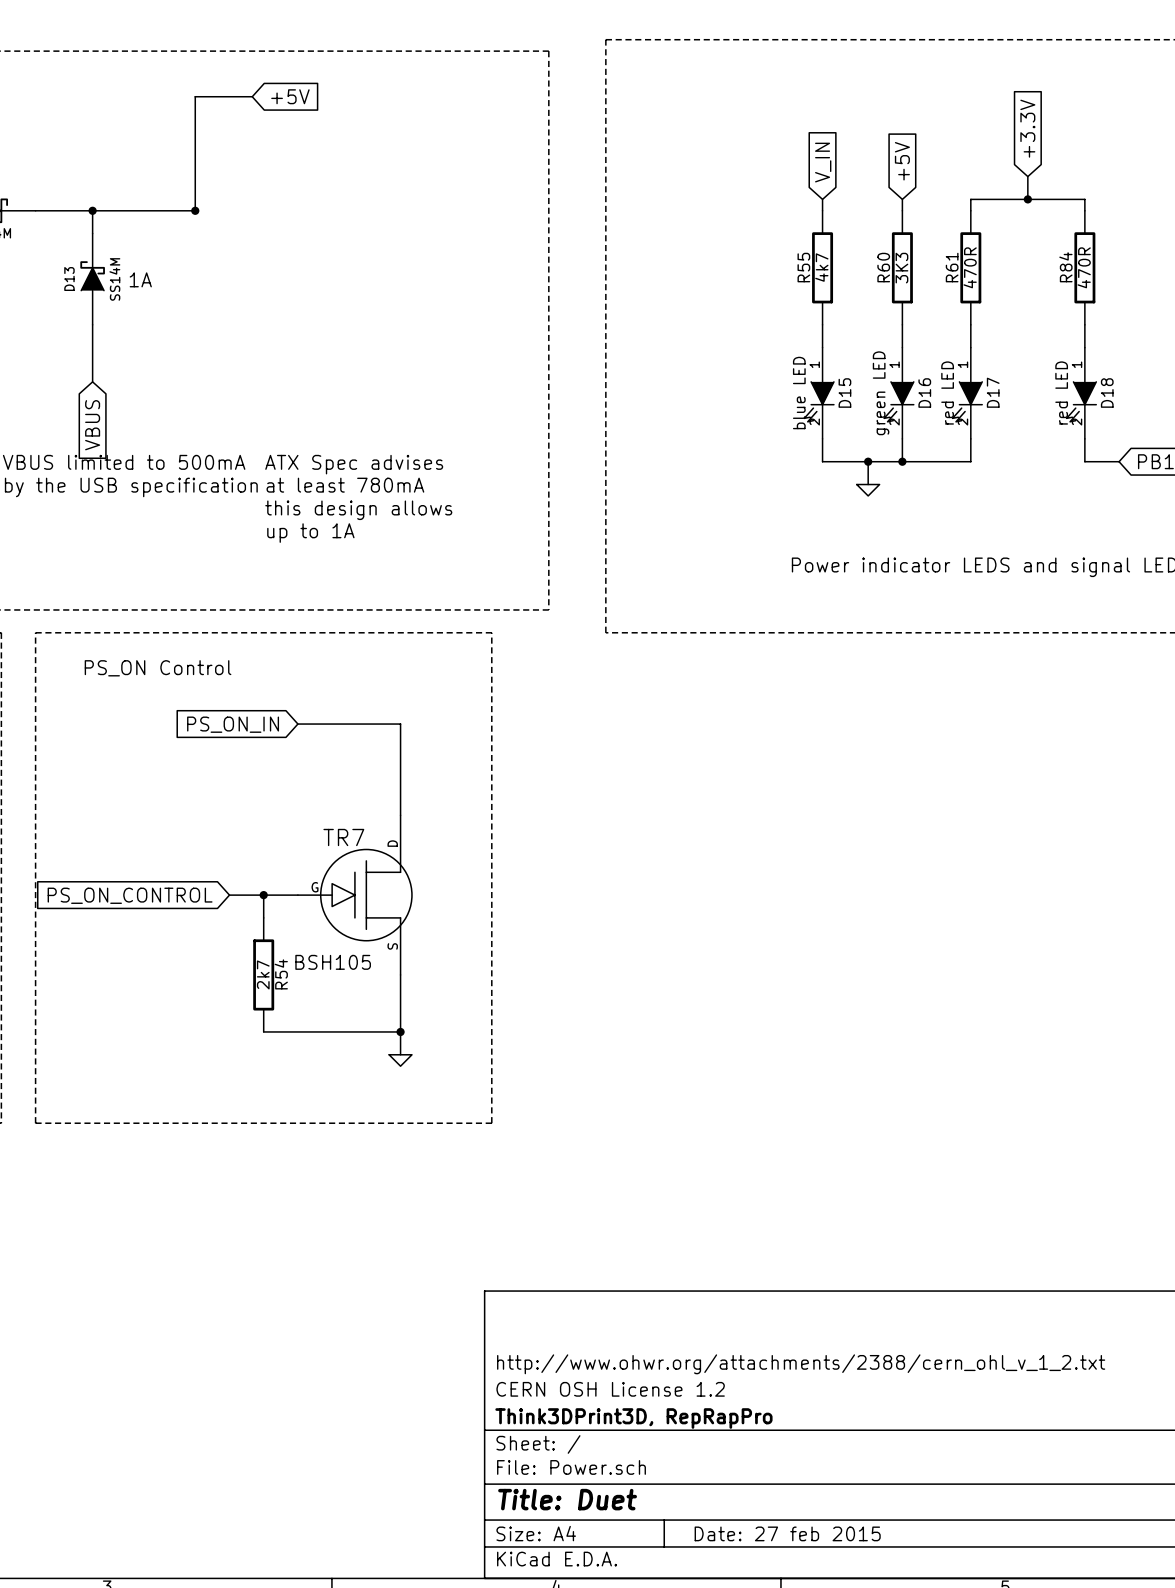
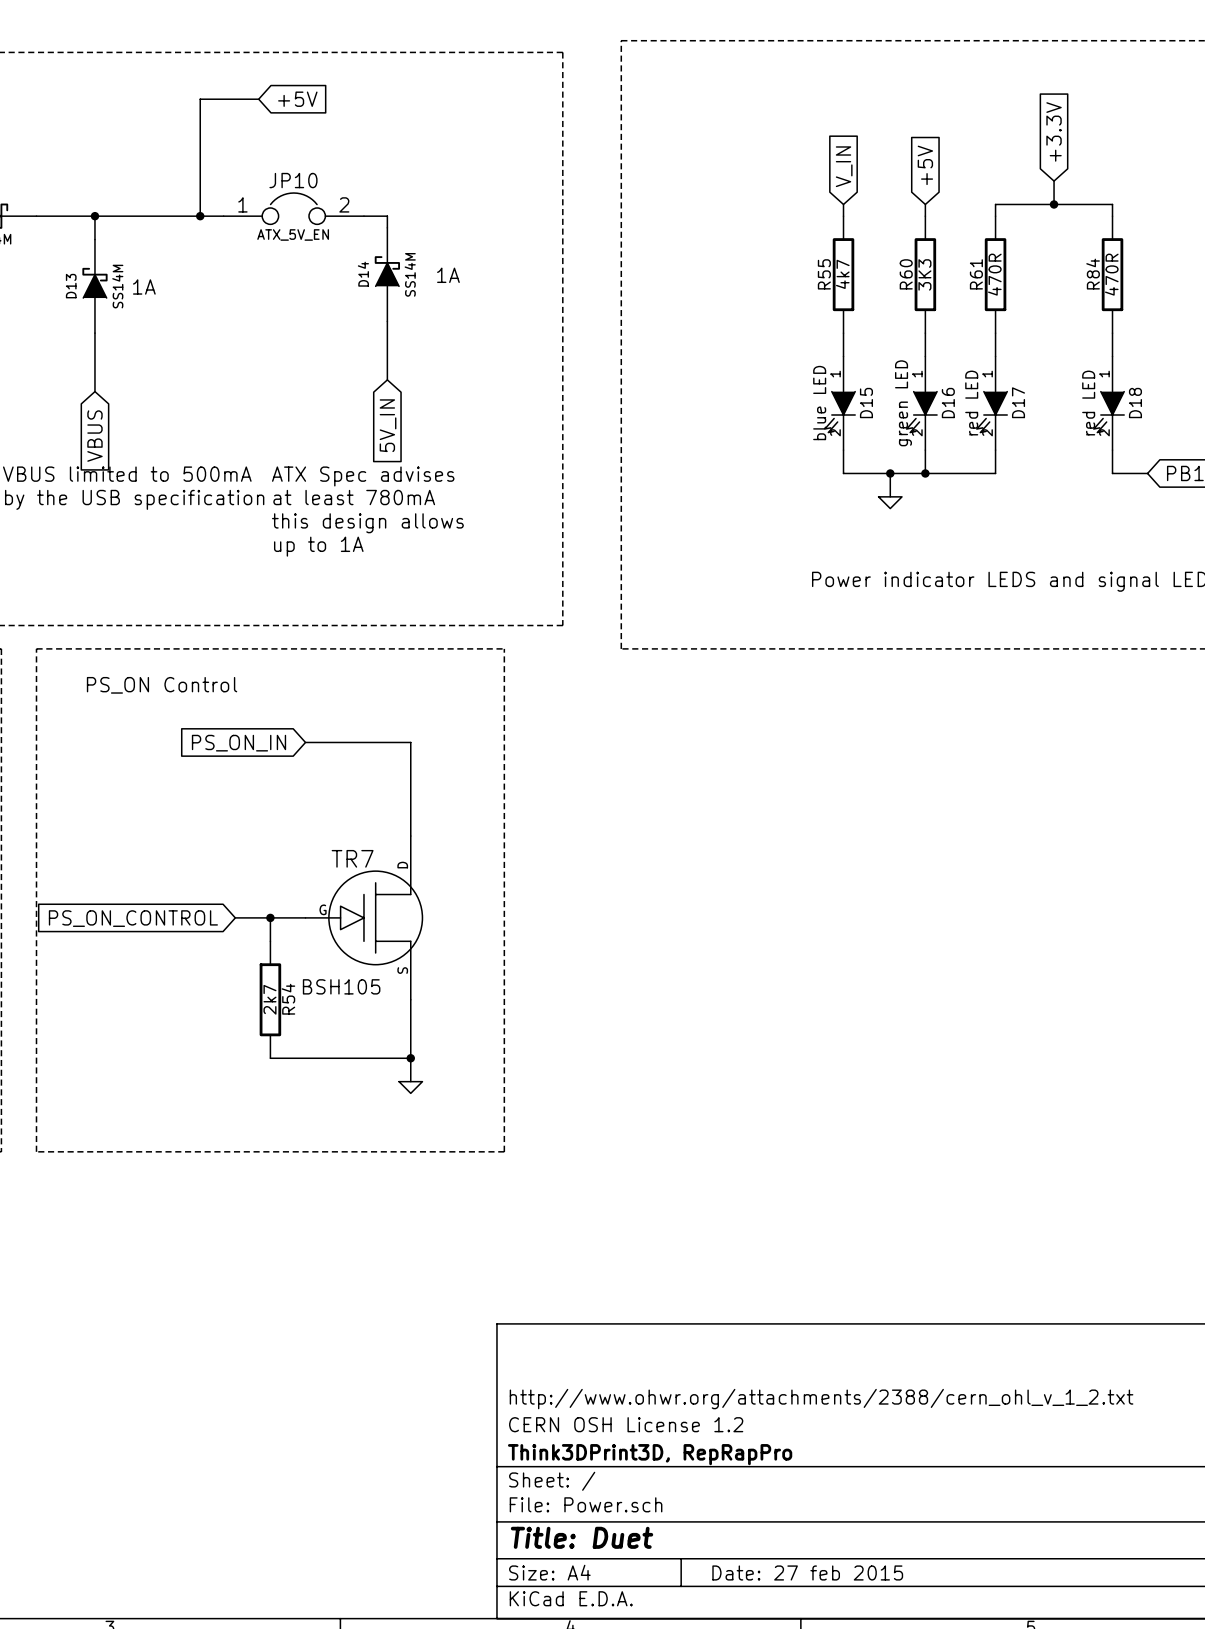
JP10: none -> ATX_5V_EN (293, 208)
wire: none -> (200, 216) (223, 216)
wire: none -> (363, 216) (387, 216) (387, 227)
D14: none -> SS14M (387, 274)
text: none -> 1A (448, 275)
wire: none -> (387, 321) (387, 379)
global label: none -> 5V_IN (388, 425)

